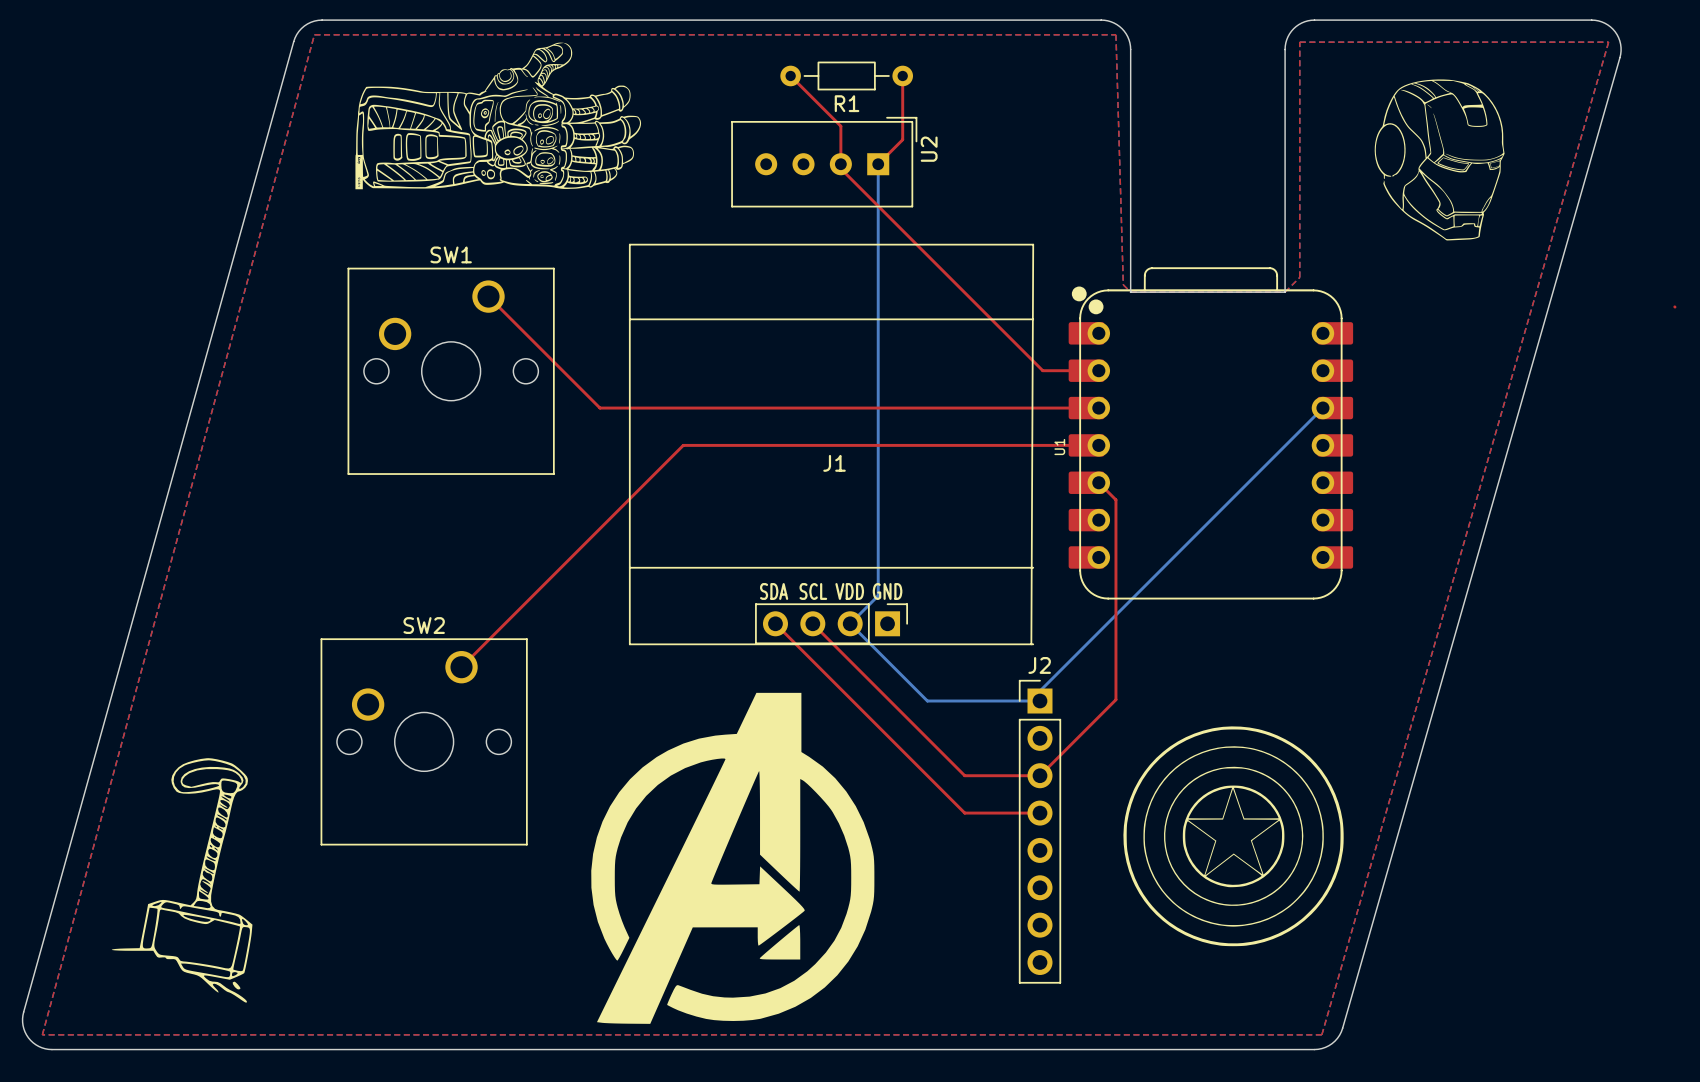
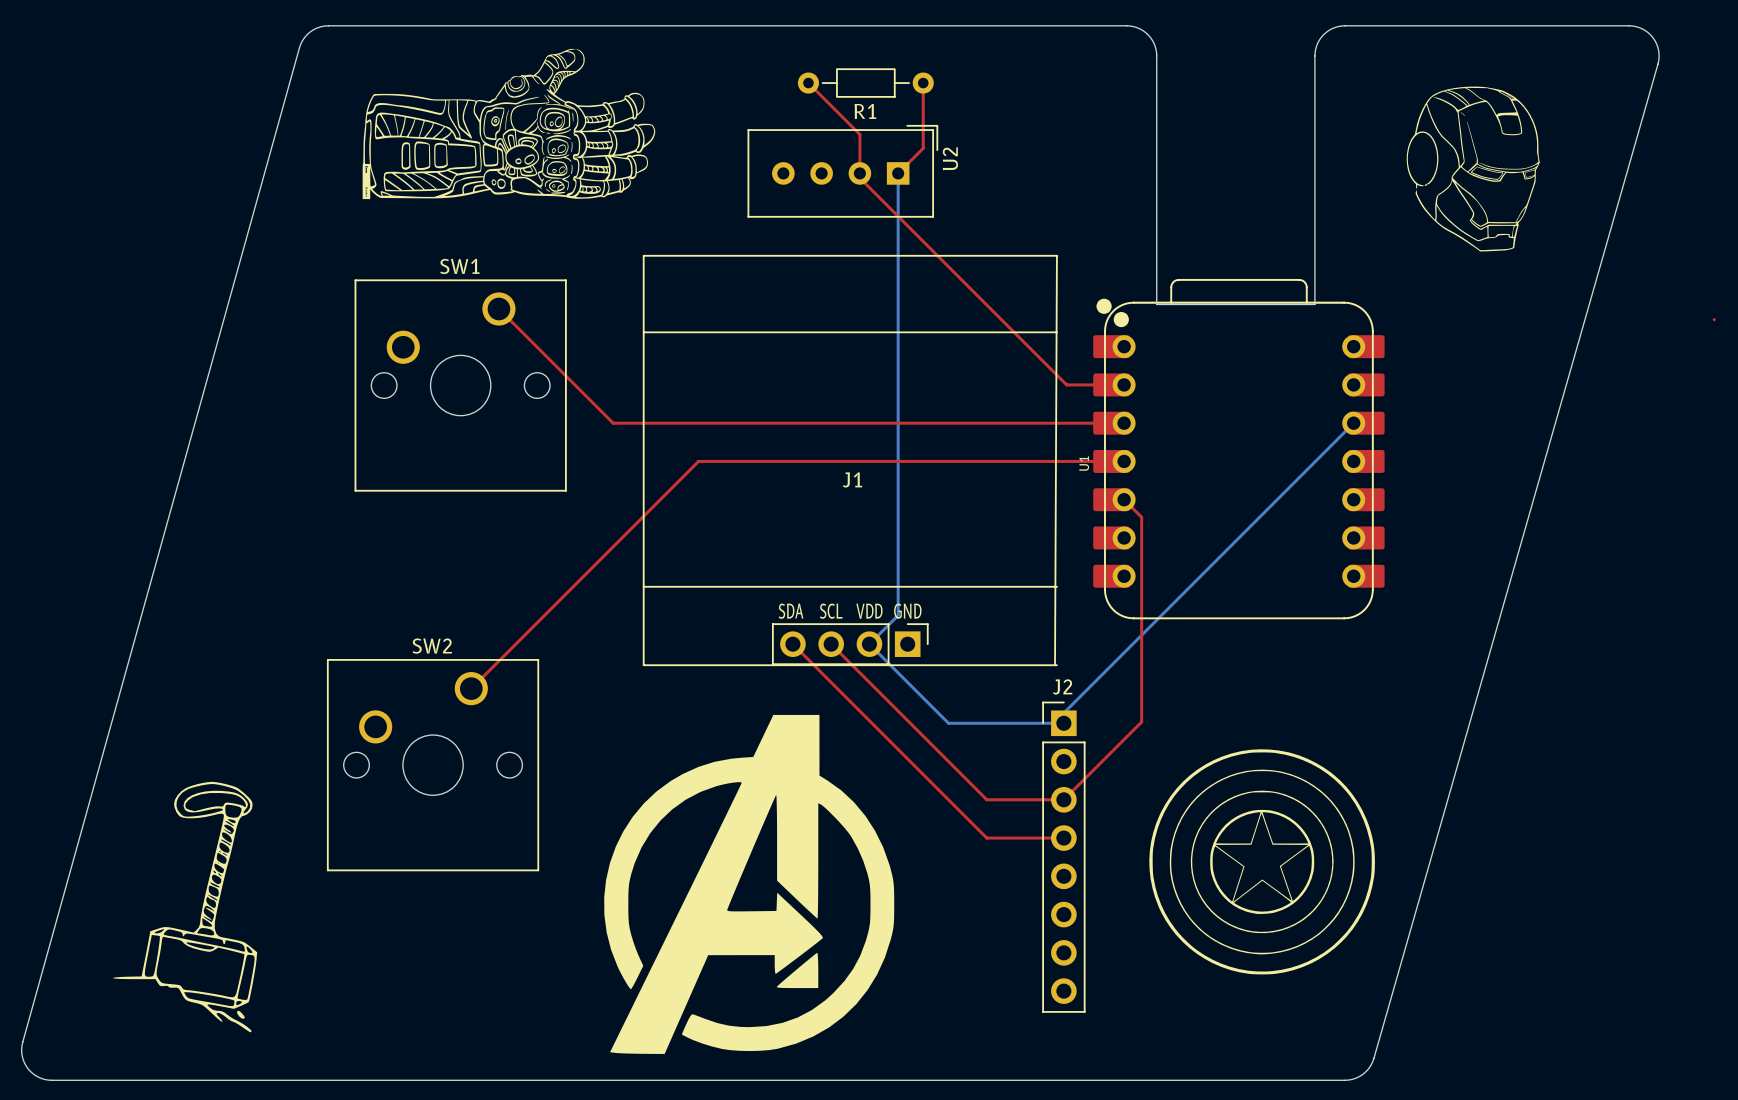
top zone outline: (314, 34) (42, 1034) (1321, 1034) (1608, 42) (1299, 42) (1299, 277) (1285, 292) (1130, 292) (1123, 284) (1115, 34) (314, 34) -> none

